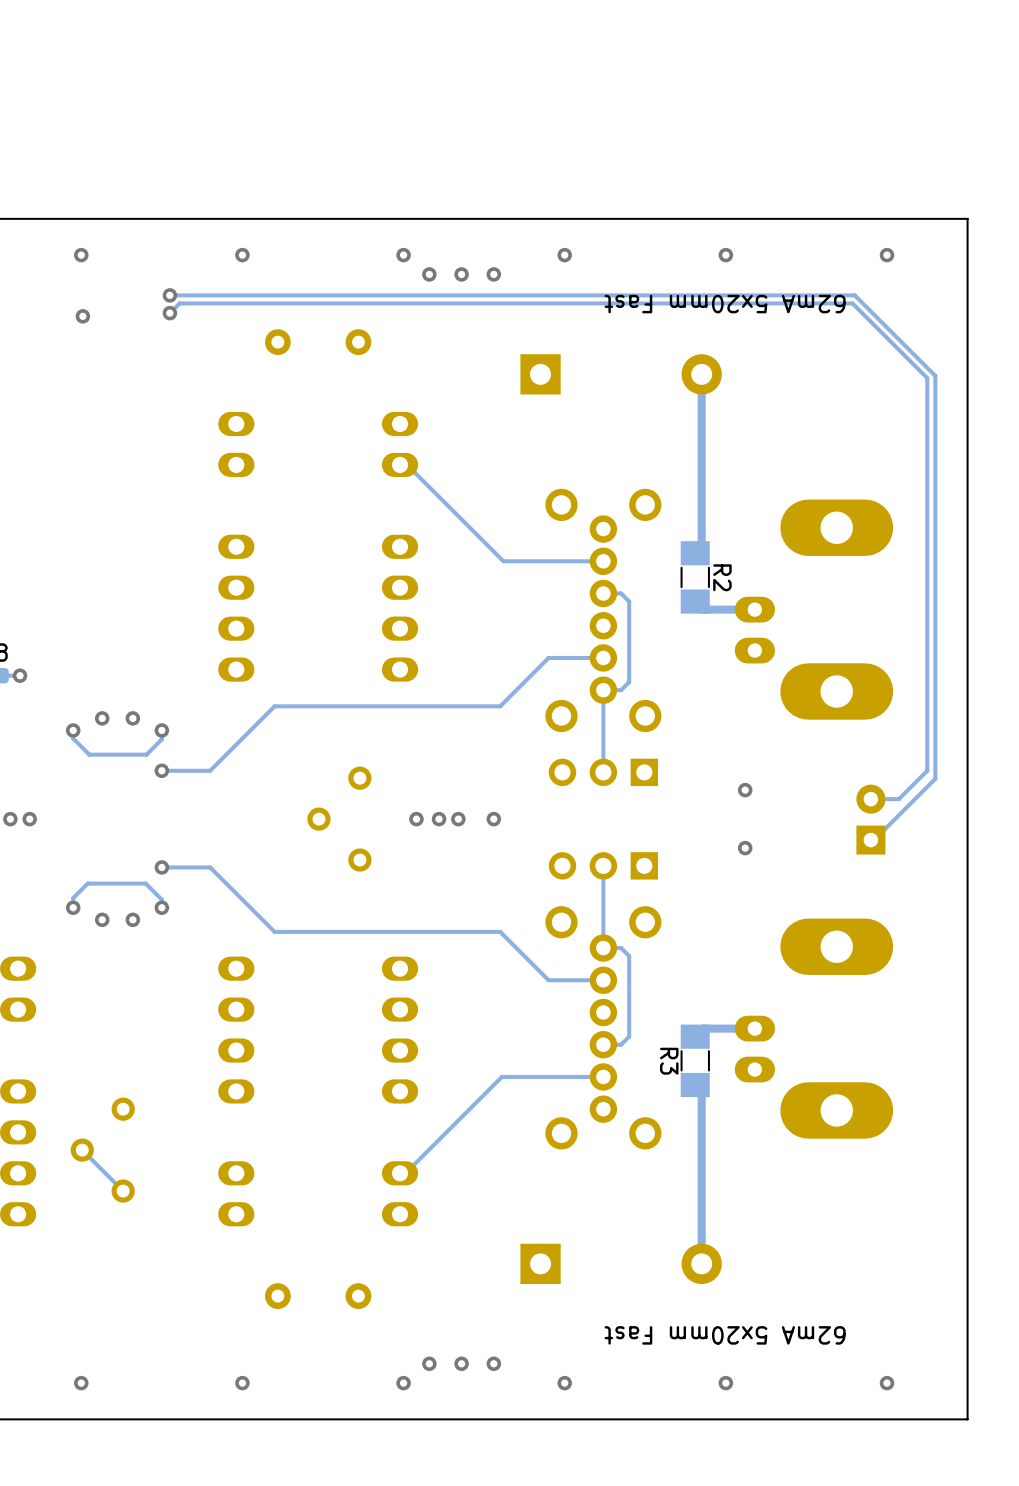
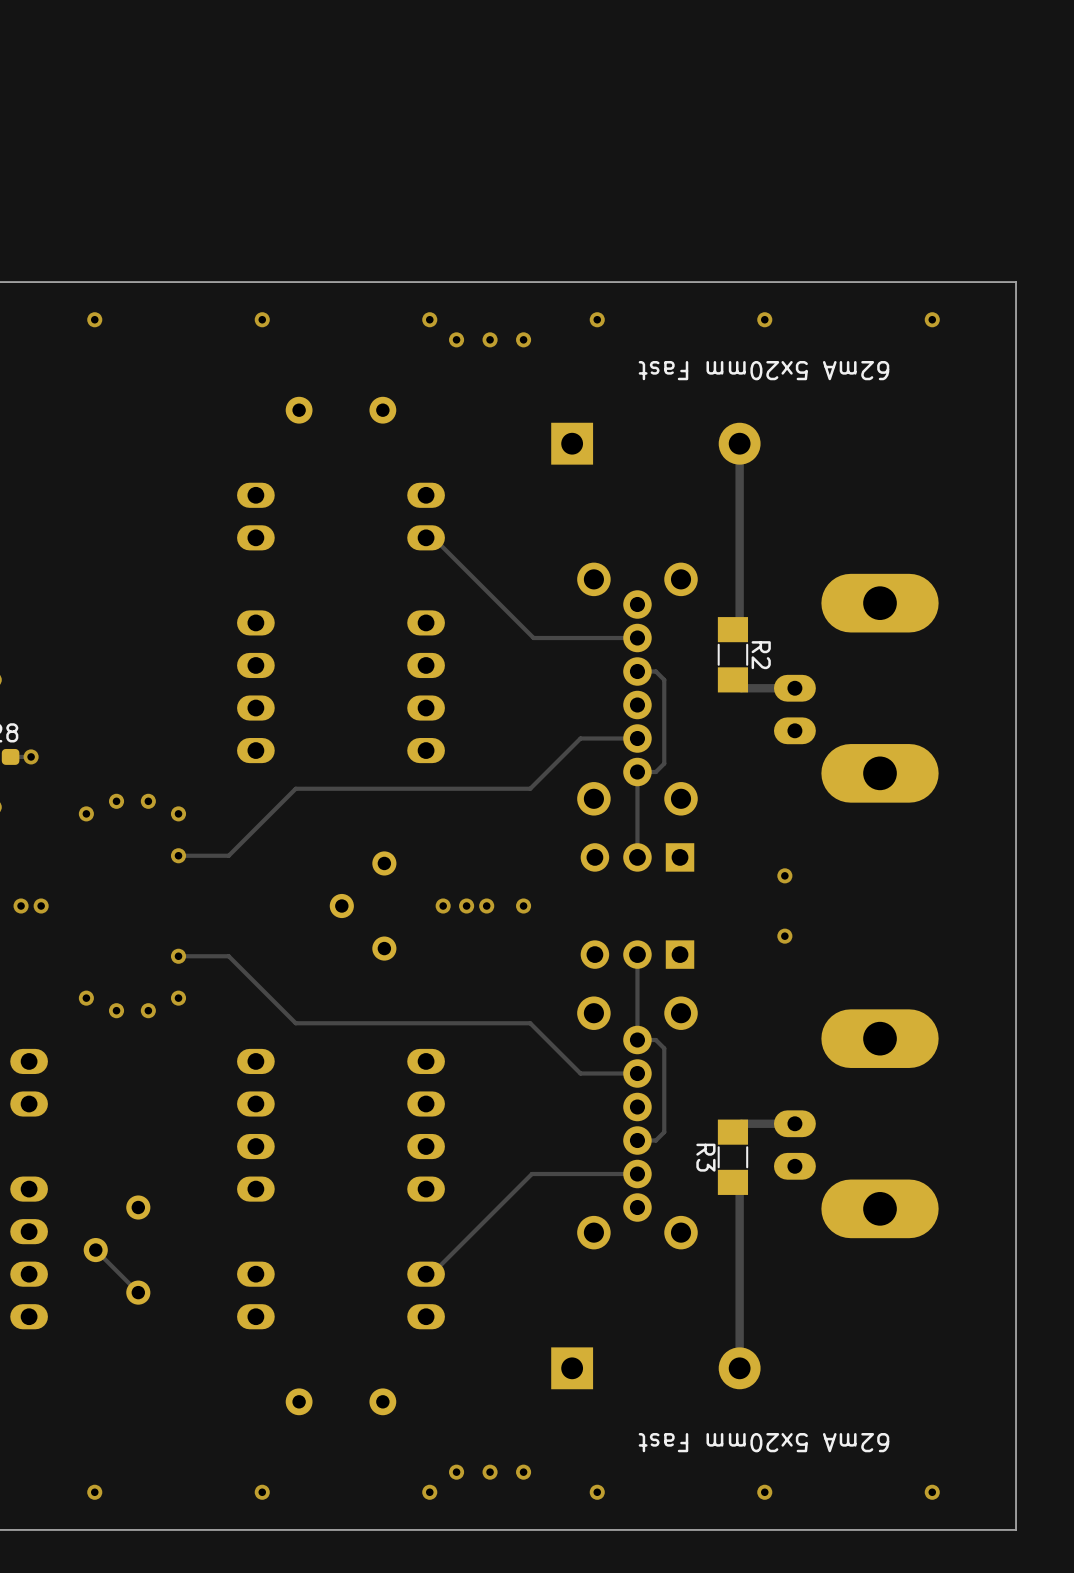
track: (169, 295) (854, 295) (935, 375) (935, 778) (874, 840) (870, 840) -> none
via: (169, 295) -> none
track: (169, 313) (179, 303) (852, 303) (927, 378) (927, 770) (898, 799) (870, 799) -> none
via: (169, 313) -> none
via: (82, 316) -> none
track: (161, 730) (161, 739) (146, 754) (89, 754) (73, 738) (73, 730) -> none
part: (870, 819) -> none
track: (161, 907) (161, 899) (145, 883) (87, 883) (73, 898) (73, 907) -> none

